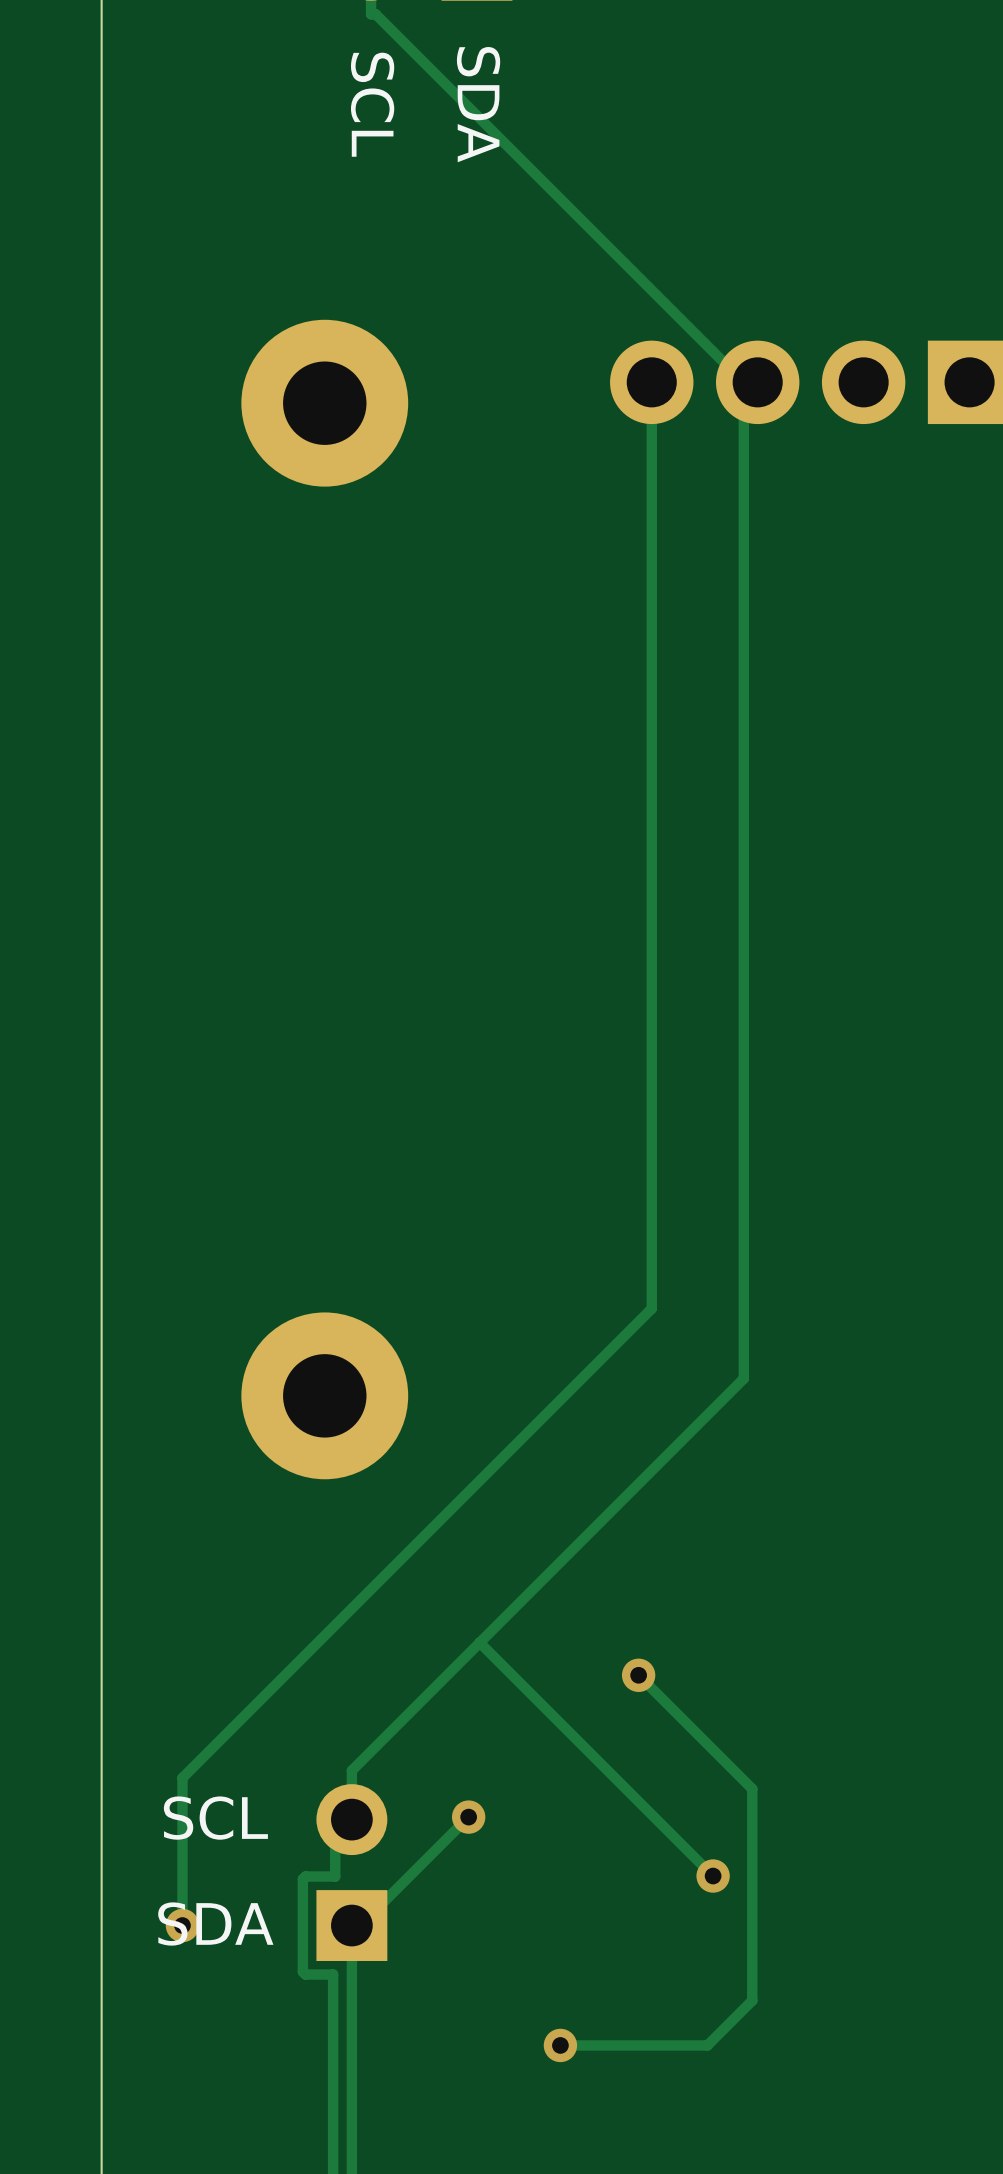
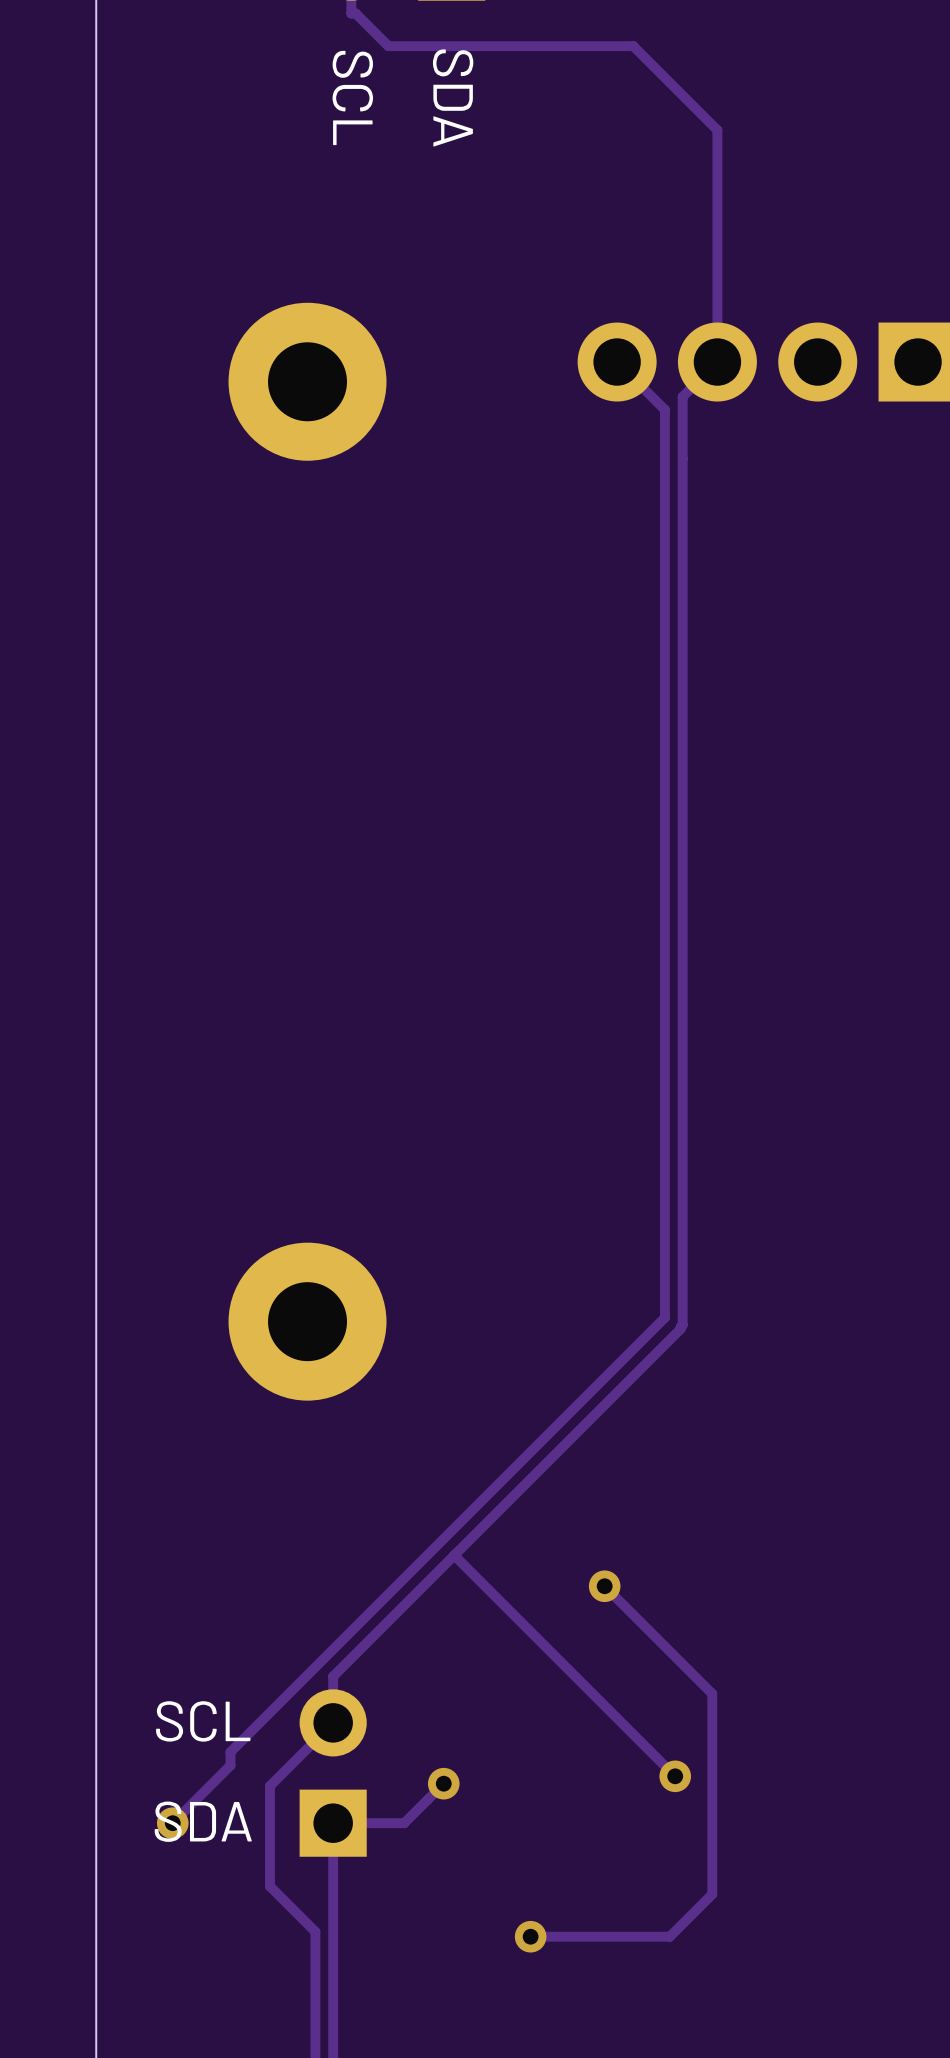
track: (410, 48) (743, 382) -> none
track: (651, 382) (651, 1308) (182, 1777) (182, 1925) -> (617, 362) (664, 409) (664, 1317) (230, 1752) (230, 1765) (172, 1823)
track: (743, 382) (743, 1378) (718, 1403) -> (388, 46) (633, 46) (717, 130) (717, 362) (682, 396) (682, 1325) (680, 1328)
track: (468, 1817) (360, 1925) -> (443, 1783) (404, 1823) (341, 1823)
via position: (468, 1817) -> (443, 1783)
track: (335, 1836) (335, 1876) (305, 1876) (302, 1879) (302, 1971) (305, 1974) (333, 1974) (333, 2040) -> (317, 1738) (269, 1786) (269, 1886) (315, 1931)

